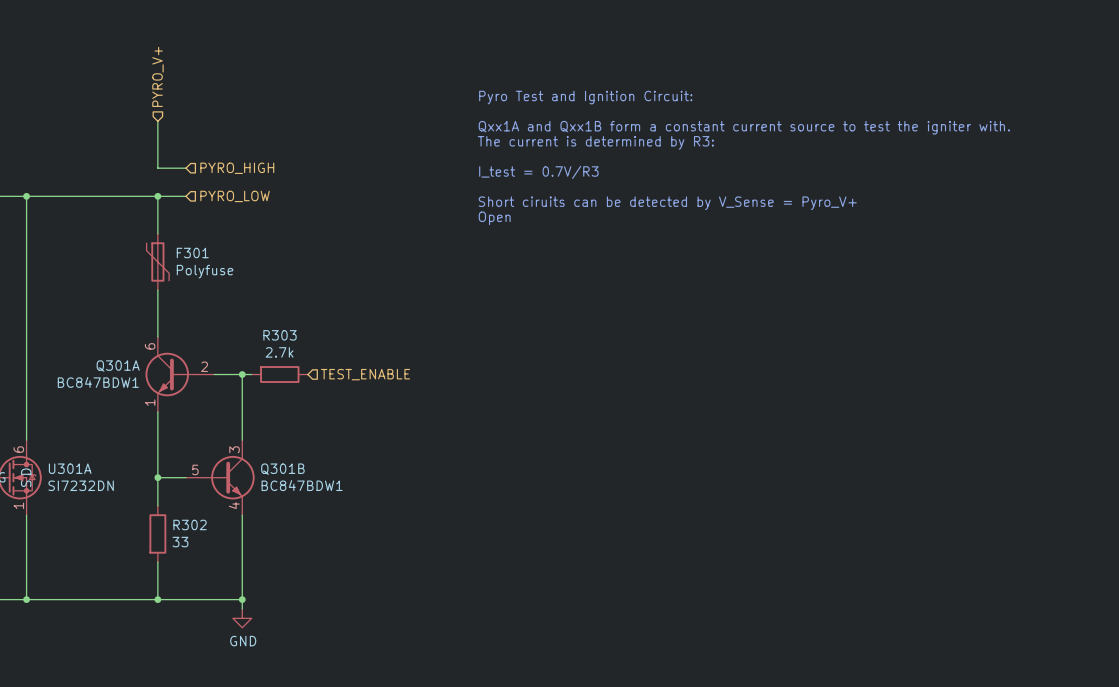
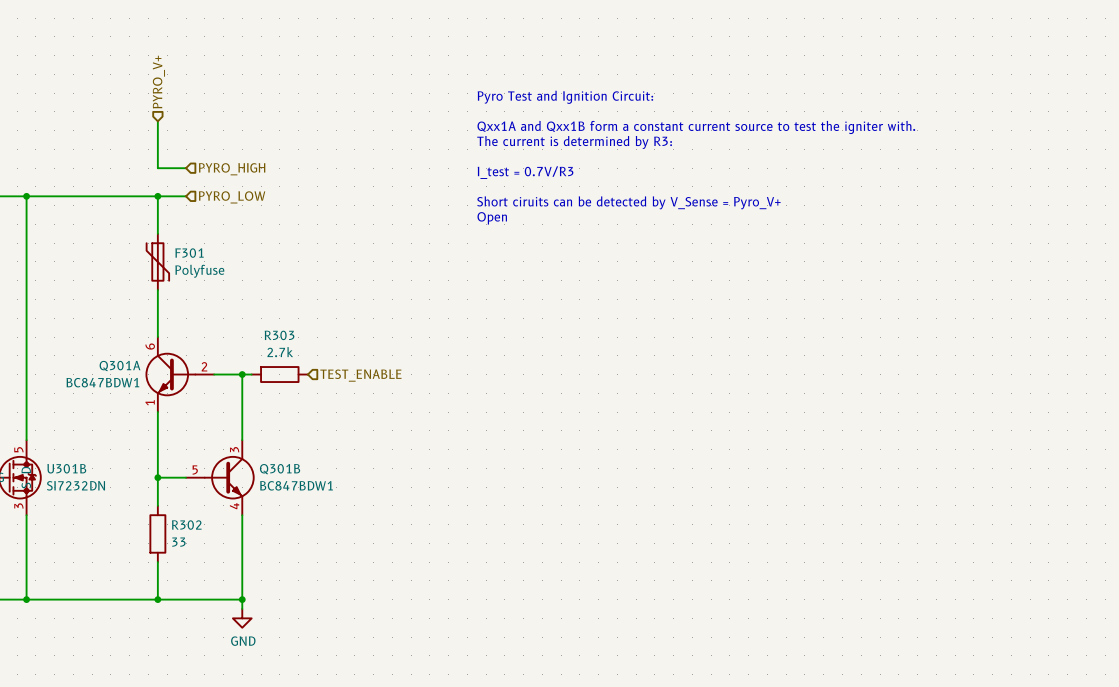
U301A pin number: 6 (18, 449) -> 5 (18, 449)
U301A name: U301A (70, 468) -> U301B (66, 468)
U301A pin number: 1 (18, 505) -> 3 (18, 505)

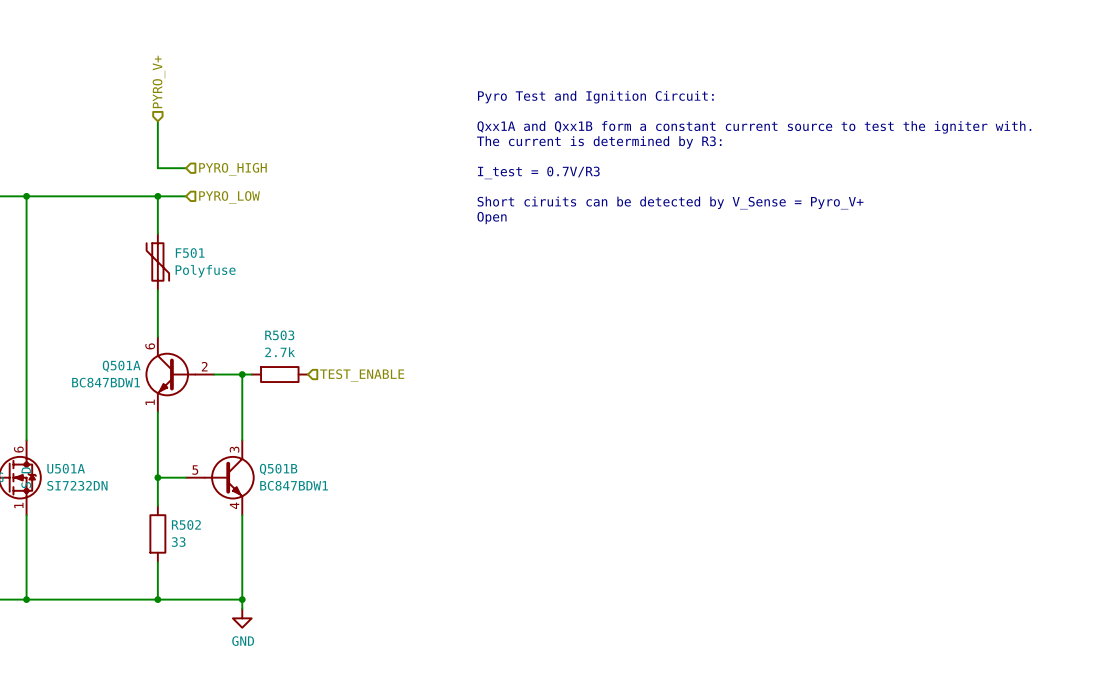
F301 name: F301 (189, 253) -> F501 (190, 253)
R303 name: R303 (279, 335) -> R503 (279, 335)
Q301A name: Q301A (120, 365) -> Q501A (121, 366)
U301B pin number: 5 (18, 449) -> 6 (18, 449)
U301B name: U301B (66, 468) -> U501A (66, 468)
Q301B name: Q301B (280, 469) -> Q501B (278, 469)
U301B pin number: 3 (18, 505) -> 1 (18, 505)
R302 name: R302 (186, 525) -> R502 (186, 524)

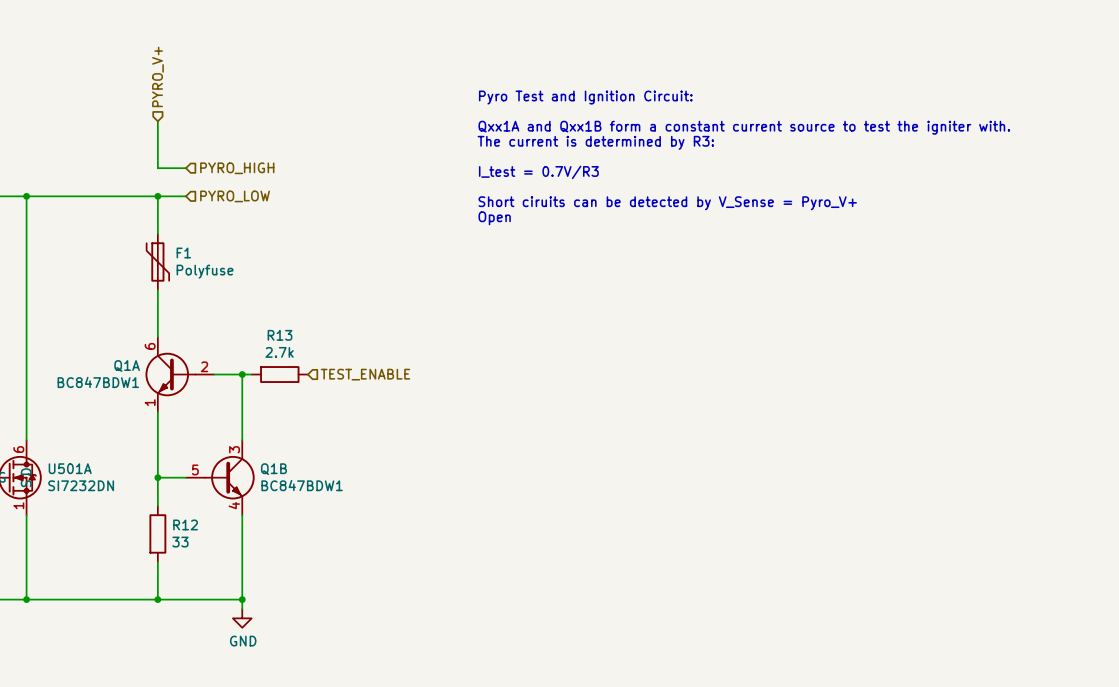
F501 name: F501 (190, 253) -> F1 (183, 253)
R503 name: R503 (279, 335) -> R13 (280, 335)
Q501A name: Q501A (121, 366) -> Q1A (127, 365)
Q501B name: Q501B (278, 469) -> Q1B (273, 469)
R502 name: R502 (186, 524) -> R12 (185, 524)

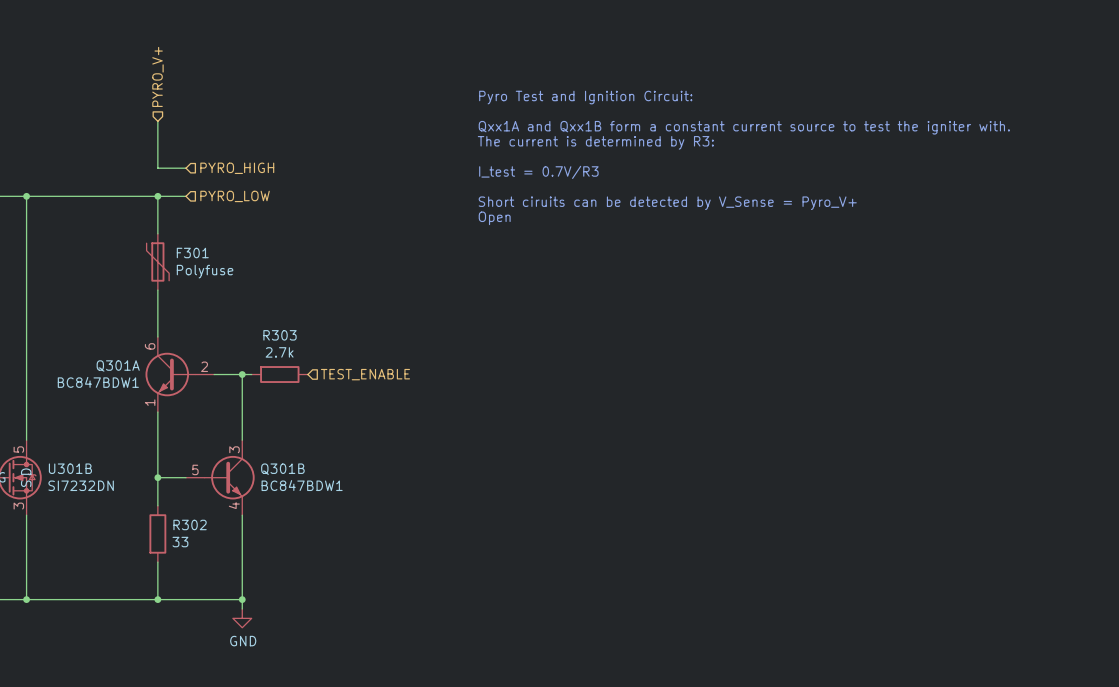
F1 name: F1 (183, 253) -> F301 (192, 253)
R13 name: R13 (280, 335) -> R303 (280, 335)
Q1A name: Q1A (127, 365) -> Q301A (118, 365)
U501A pin number: 6 (18, 449) -> 5 (18, 449)
U501A name: U501A (70, 468) -> U301B (70, 468)
Q1B name: Q1B (273, 469) -> Q301B (282, 469)
U501A pin number: 1 (18, 505) -> 3 (18, 506)
R12 name: R12 (185, 524) -> R302 (190, 524)

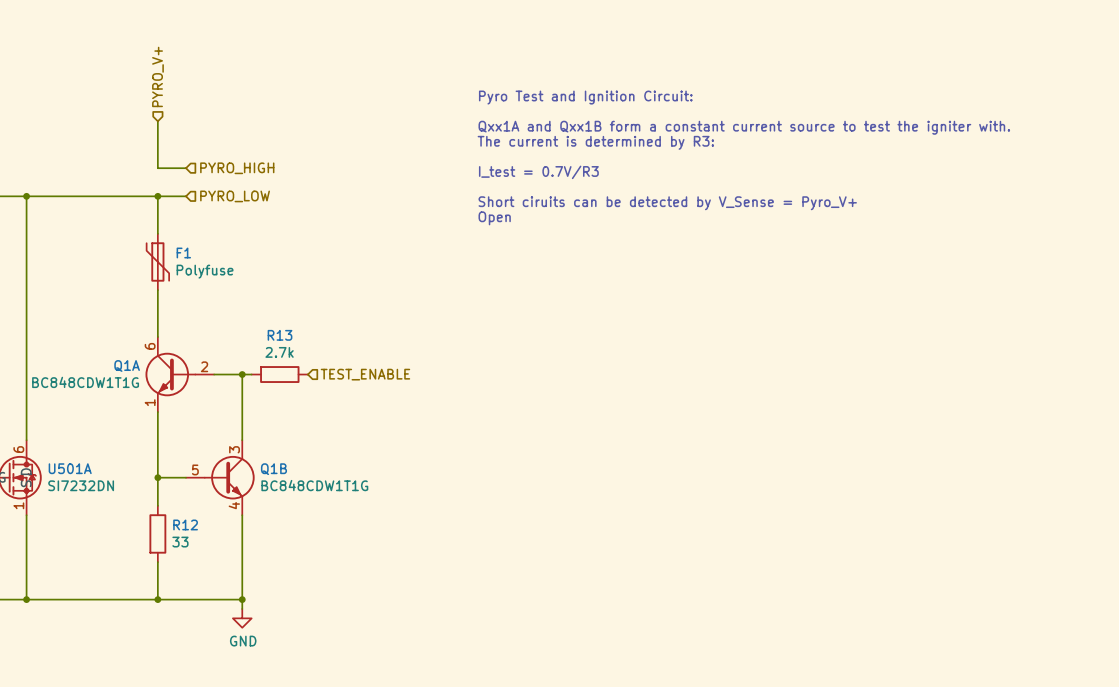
F301 name: F301 (192, 253) -> F1 (183, 253)
R303 name: R303 (280, 335) -> R13 (280, 335)
Q301A name: Q301A (118, 365) -> Q1A (127, 365)
Q301A value: BC847BDW1 (98, 382) -> BC848CDW1T1G (85, 382)
U301B pin number: 5 (18, 449) -> 6 (18, 449)
U301B name: U301B (70, 468) -> U501A (70, 468)
Q301B name: Q301B (282, 469) -> Q1B (273, 469)
Q301B value: BC847BDW1 (302, 485) -> BC848CDW1T1G (314, 485)
U301B pin number: 3 (18, 506) -> 1 (18, 505)
R302 name: R302 (190, 524) -> R12 (185, 524)

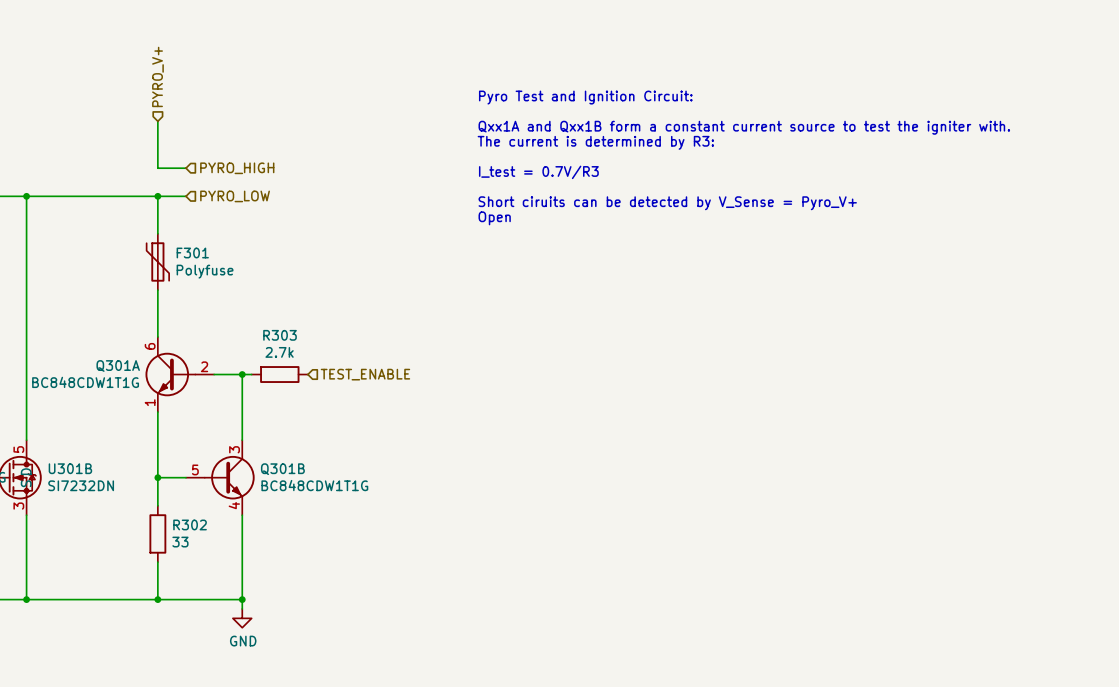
F1 name: F1 (183, 253) -> F301 (192, 253)
R13 name: R13 (280, 335) -> R303 (280, 335)
Q1A name: Q1A (127, 365) -> Q301A (118, 365)
U501A pin number: 6 (18, 449) -> 5 (18, 449)
U501A name: U501A (70, 468) -> U301B (70, 468)
Q1B name: Q1B (273, 469) -> Q301B (282, 469)
U501A pin number: 1 (18, 505) -> 3 (18, 506)
R12 name: R12 (185, 524) -> R302 (190, 524)

